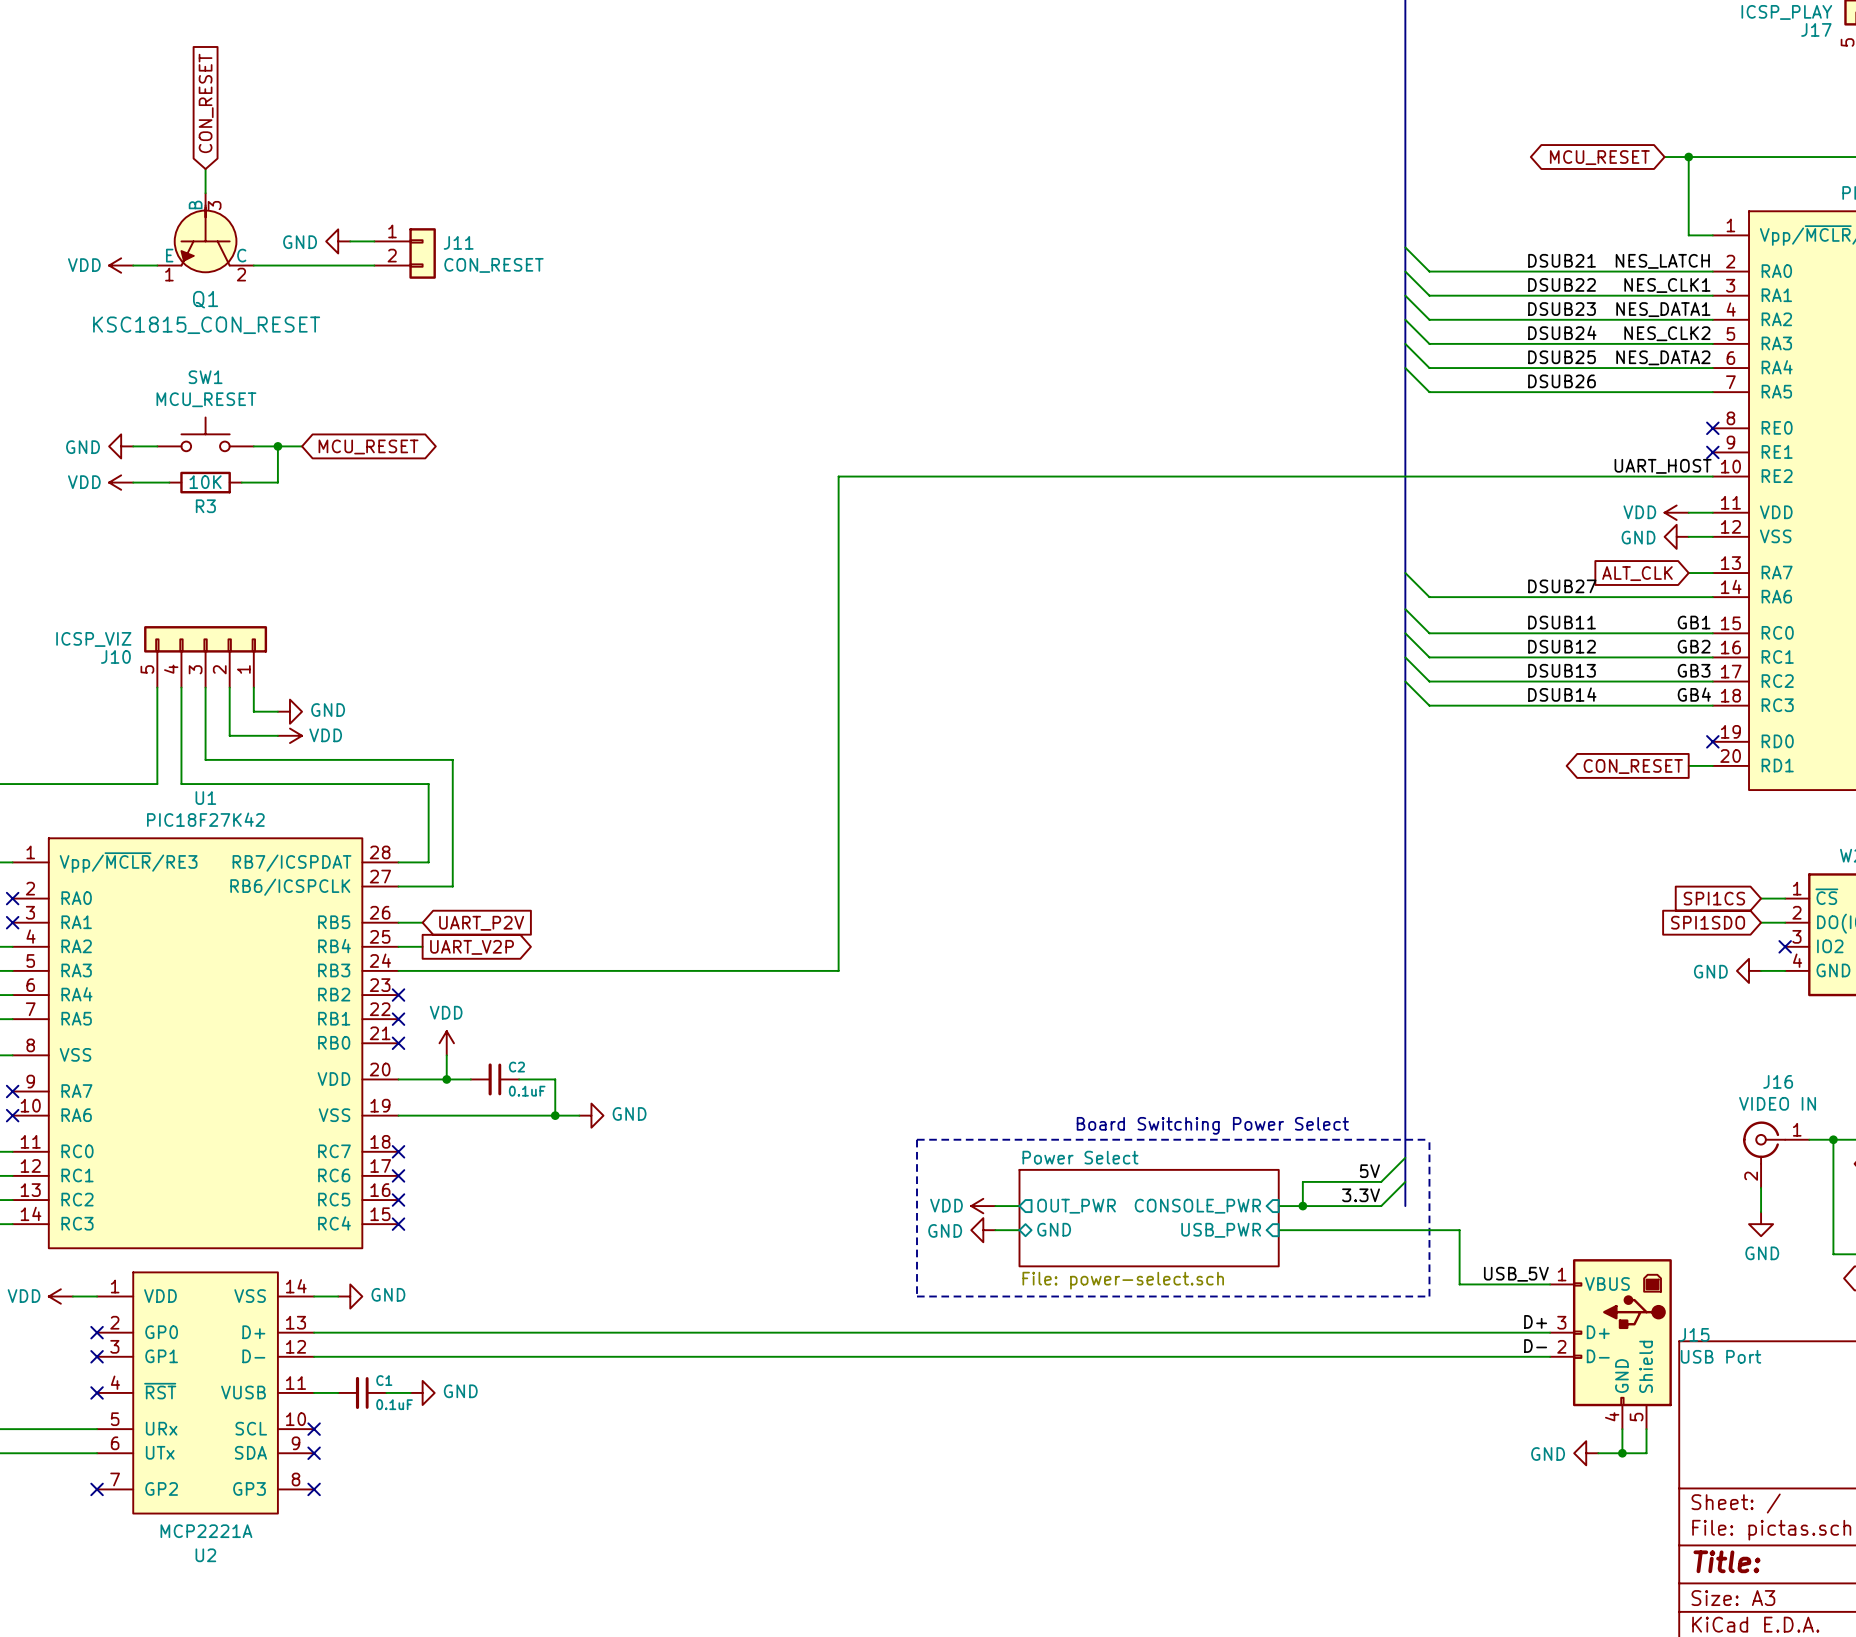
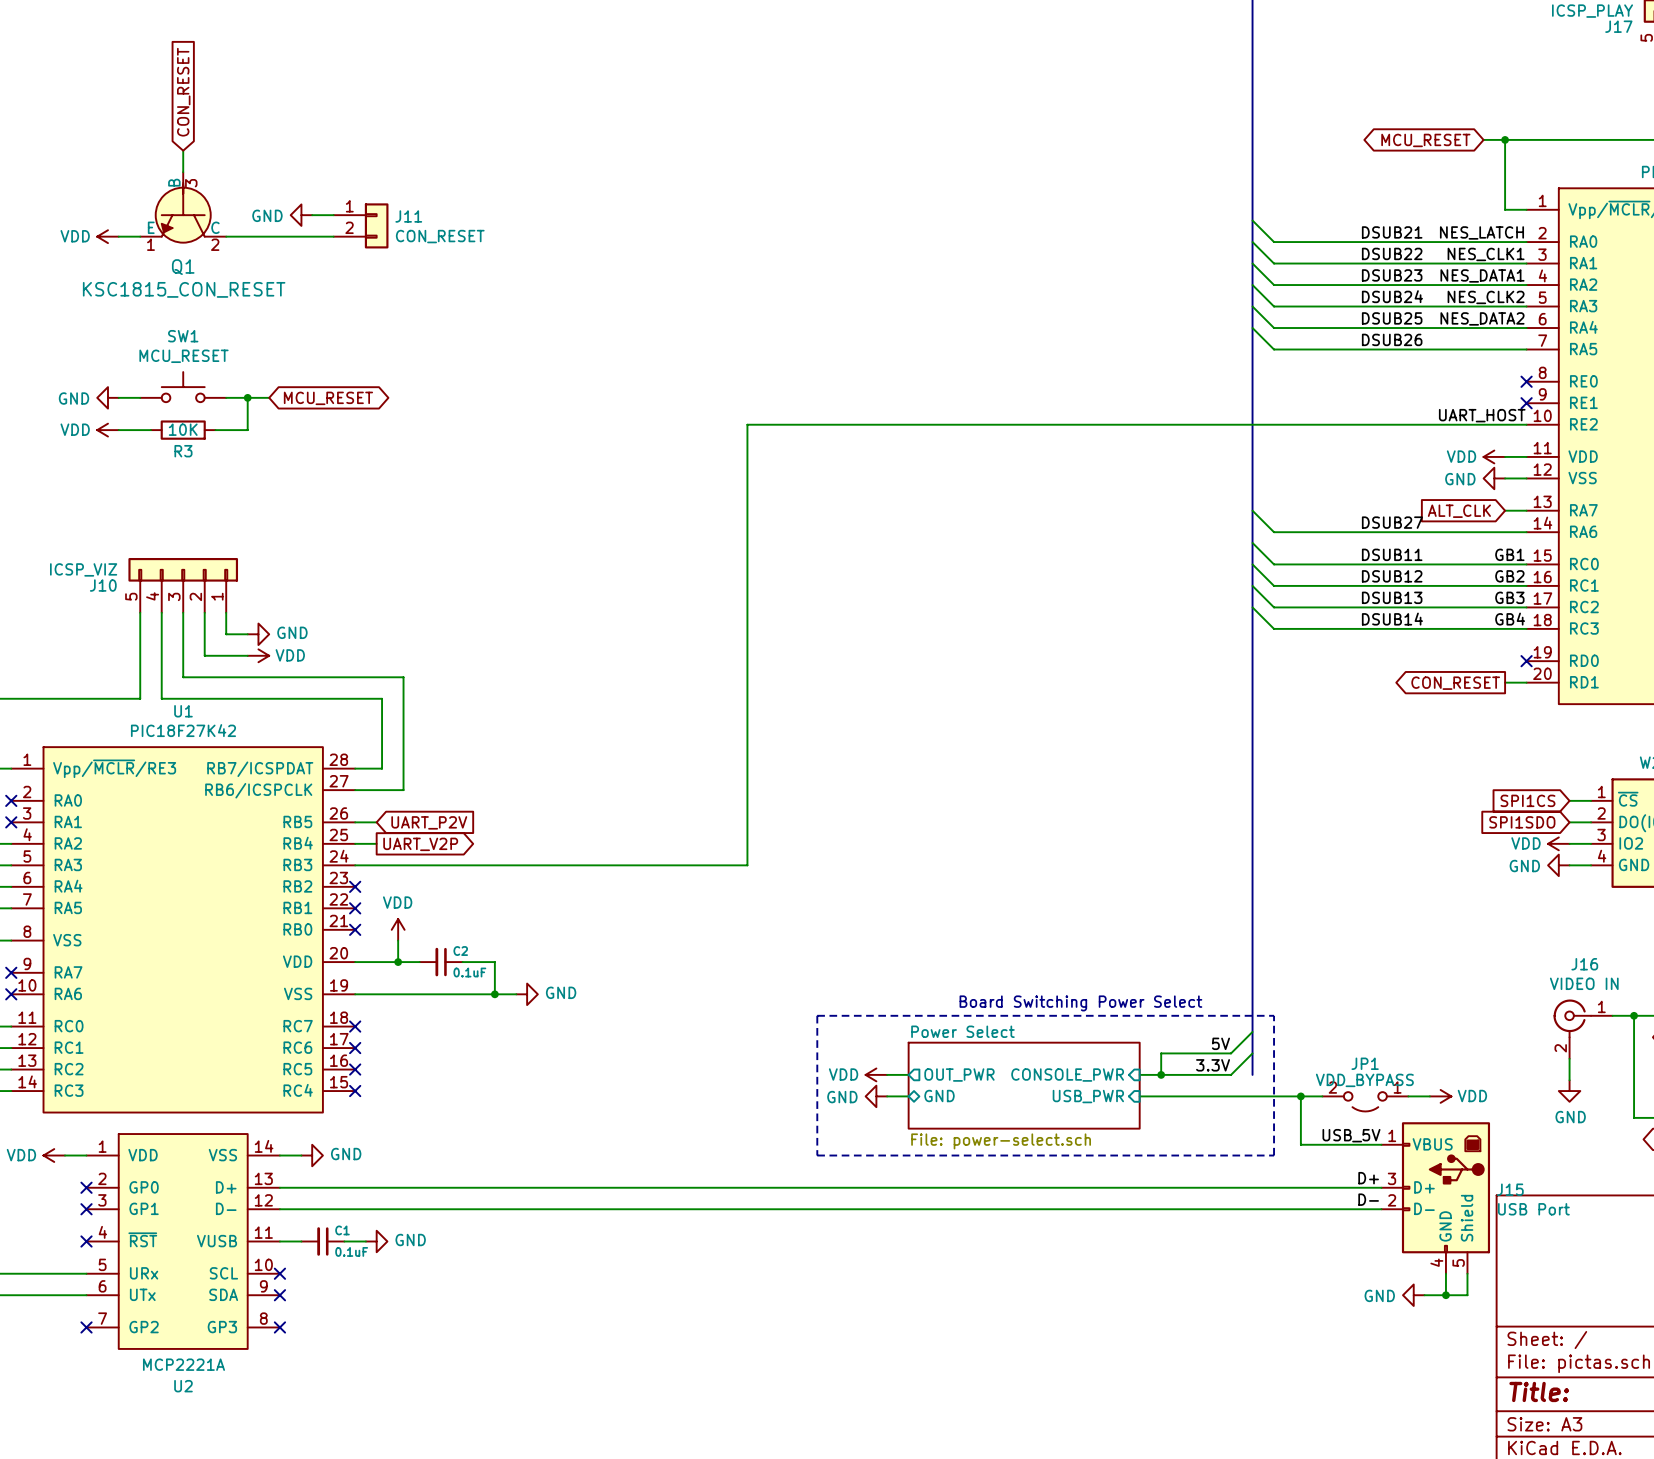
power symbol: none -> VDD (1558, 843)
wire: none -> (1569, 843) (1591, 843)
no-connect mark: (1785, 946) -> none
wire: none -> (1300, 1096) (1322, 1096)
junction: none -> (1300, 1096)
wire: none -> (1408, 1096) (1429, 1096)
power symbol: none -> VDD (1440, 1096)
JP1: none -> VDD_BYPASS (1365, 1101)

